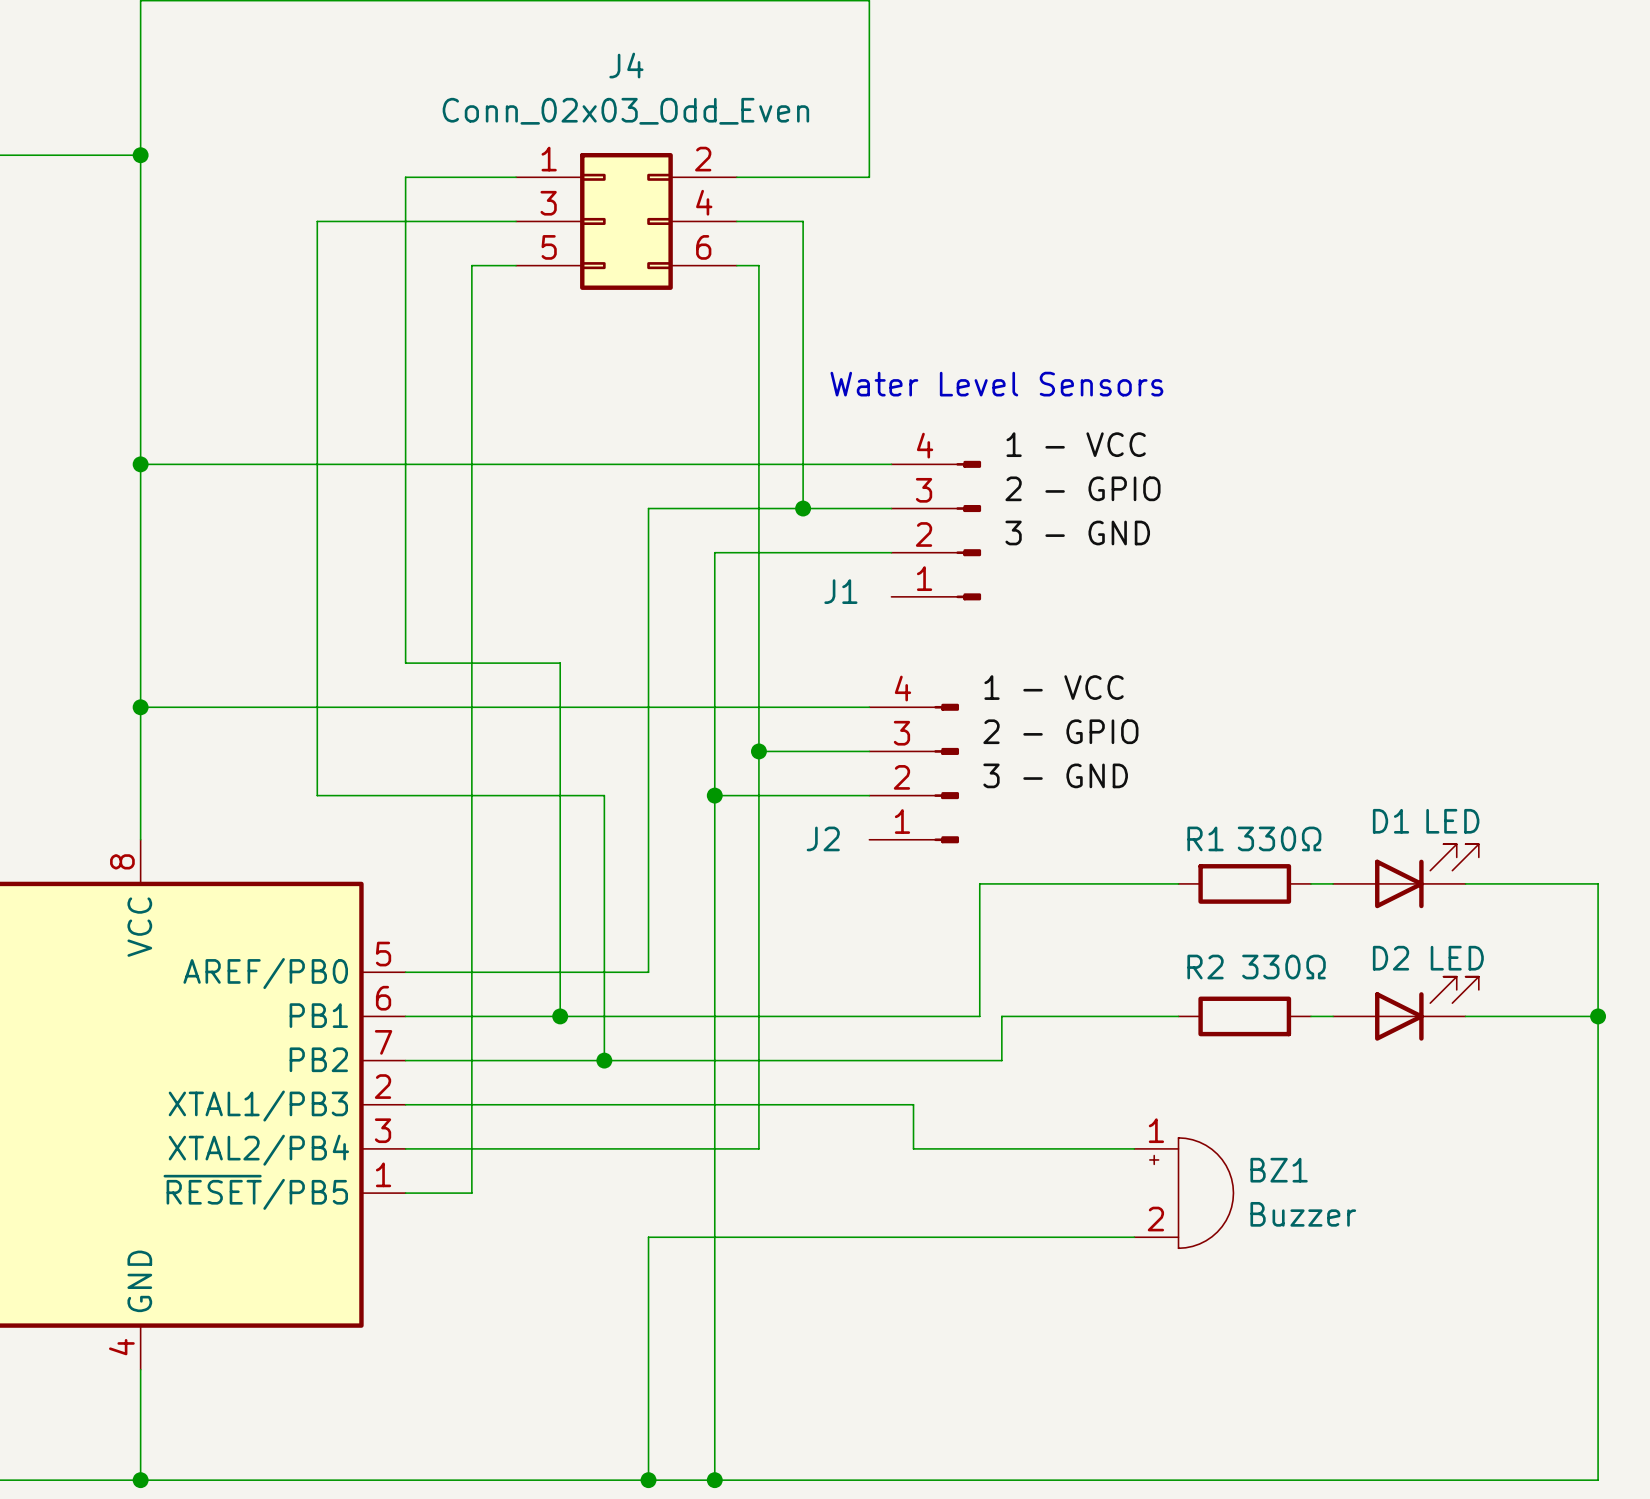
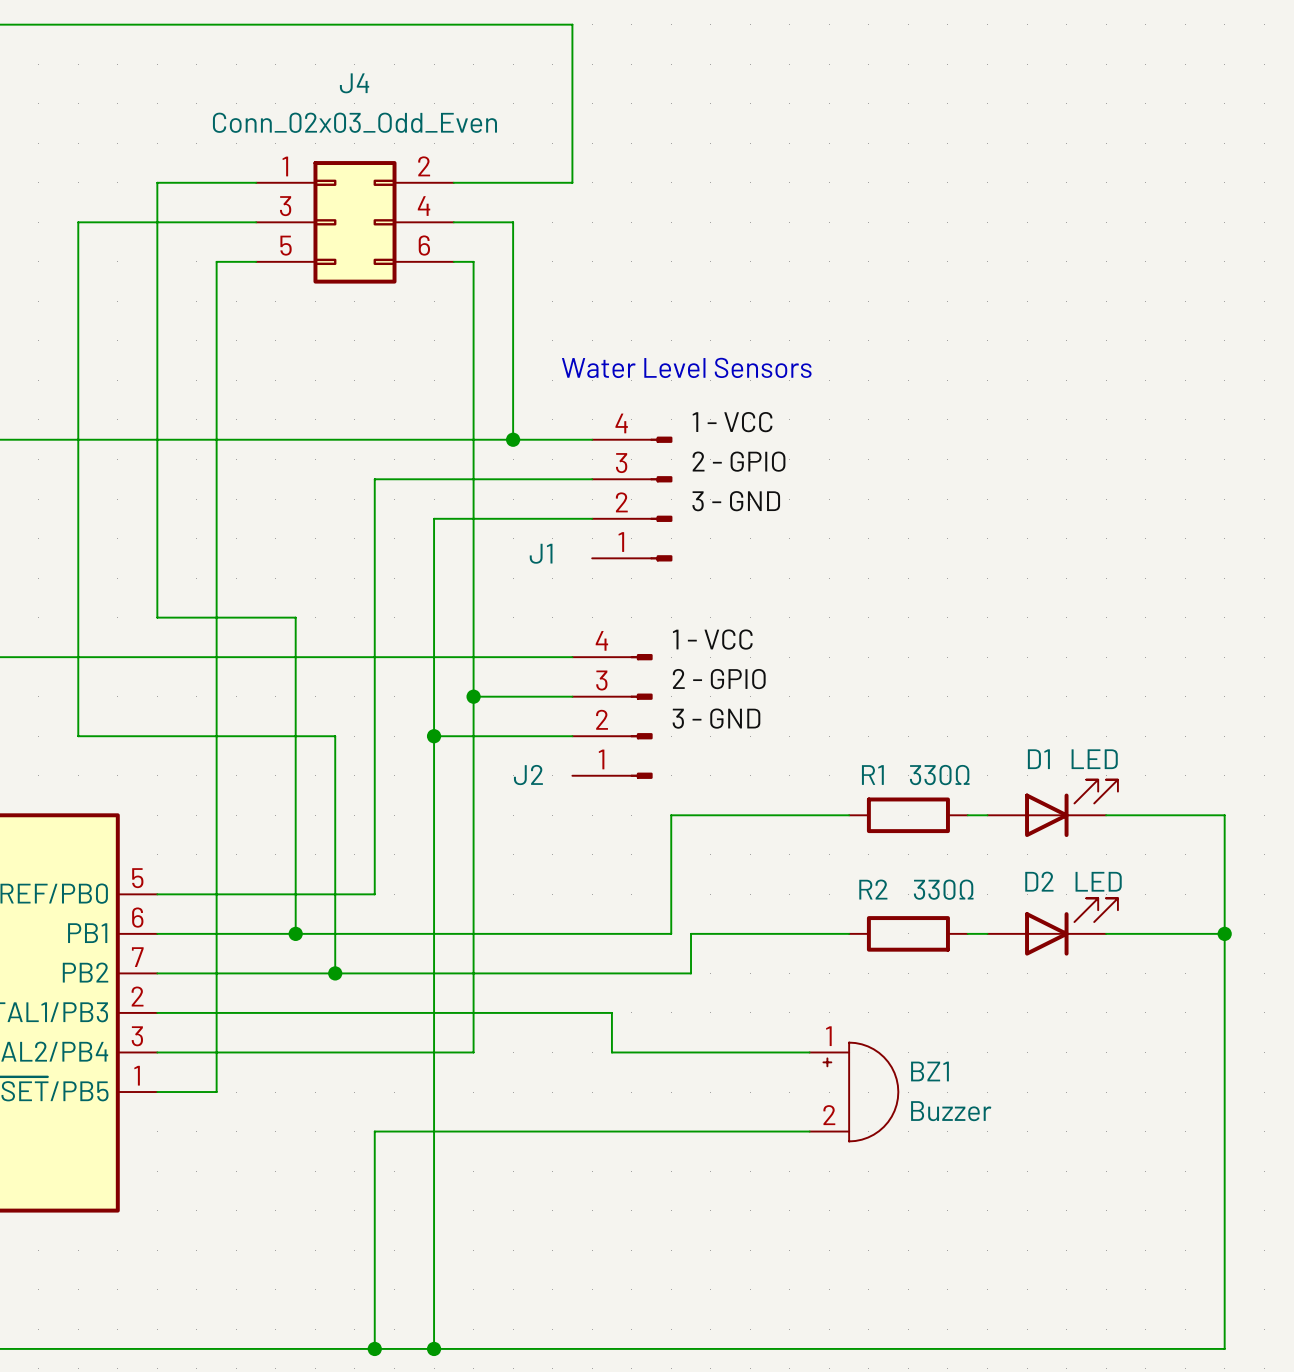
wire: (803, 464) (803, 508) -> none
junction position: (803, 508) -> (513, 439)

